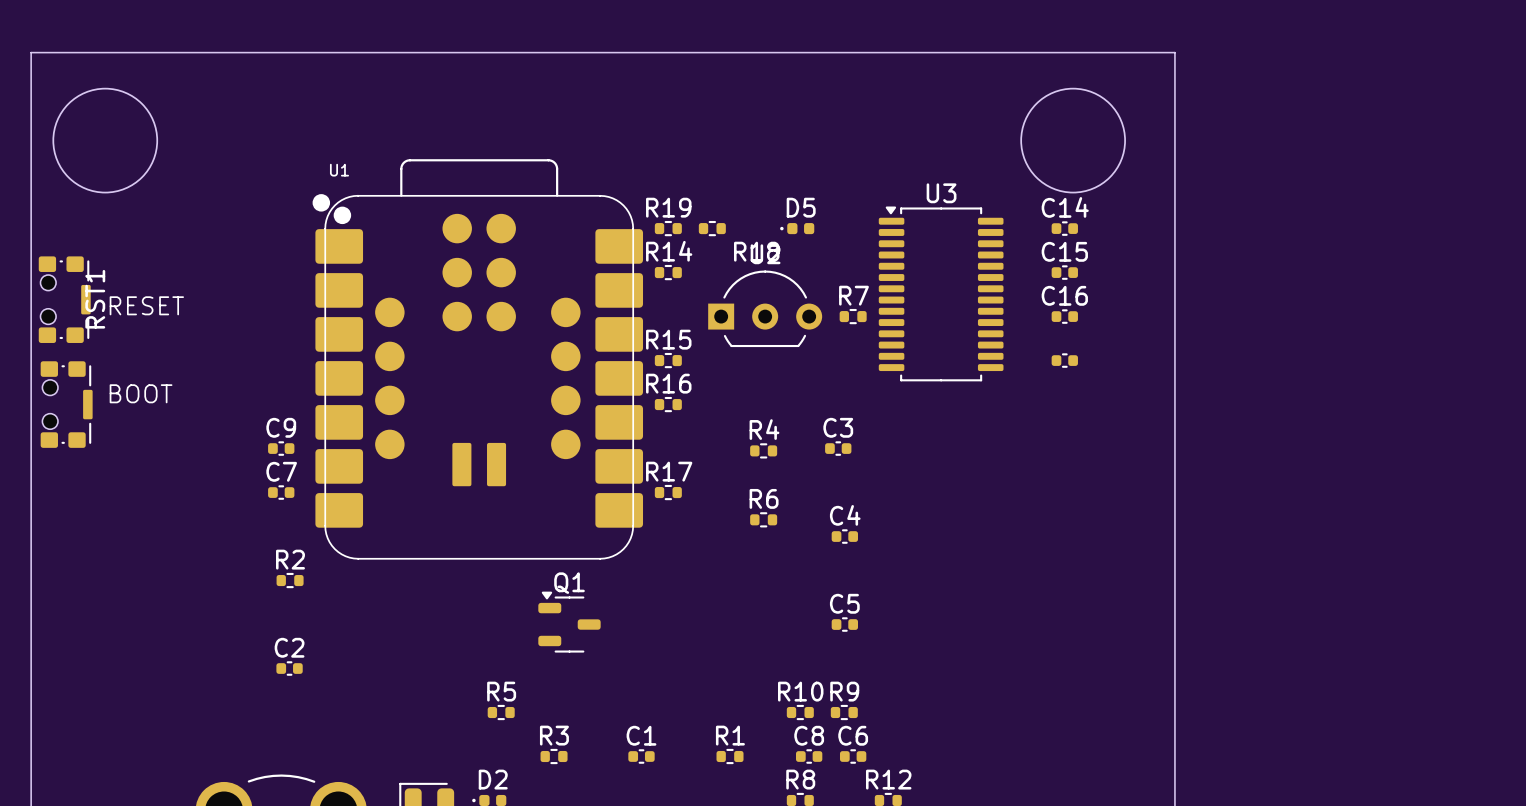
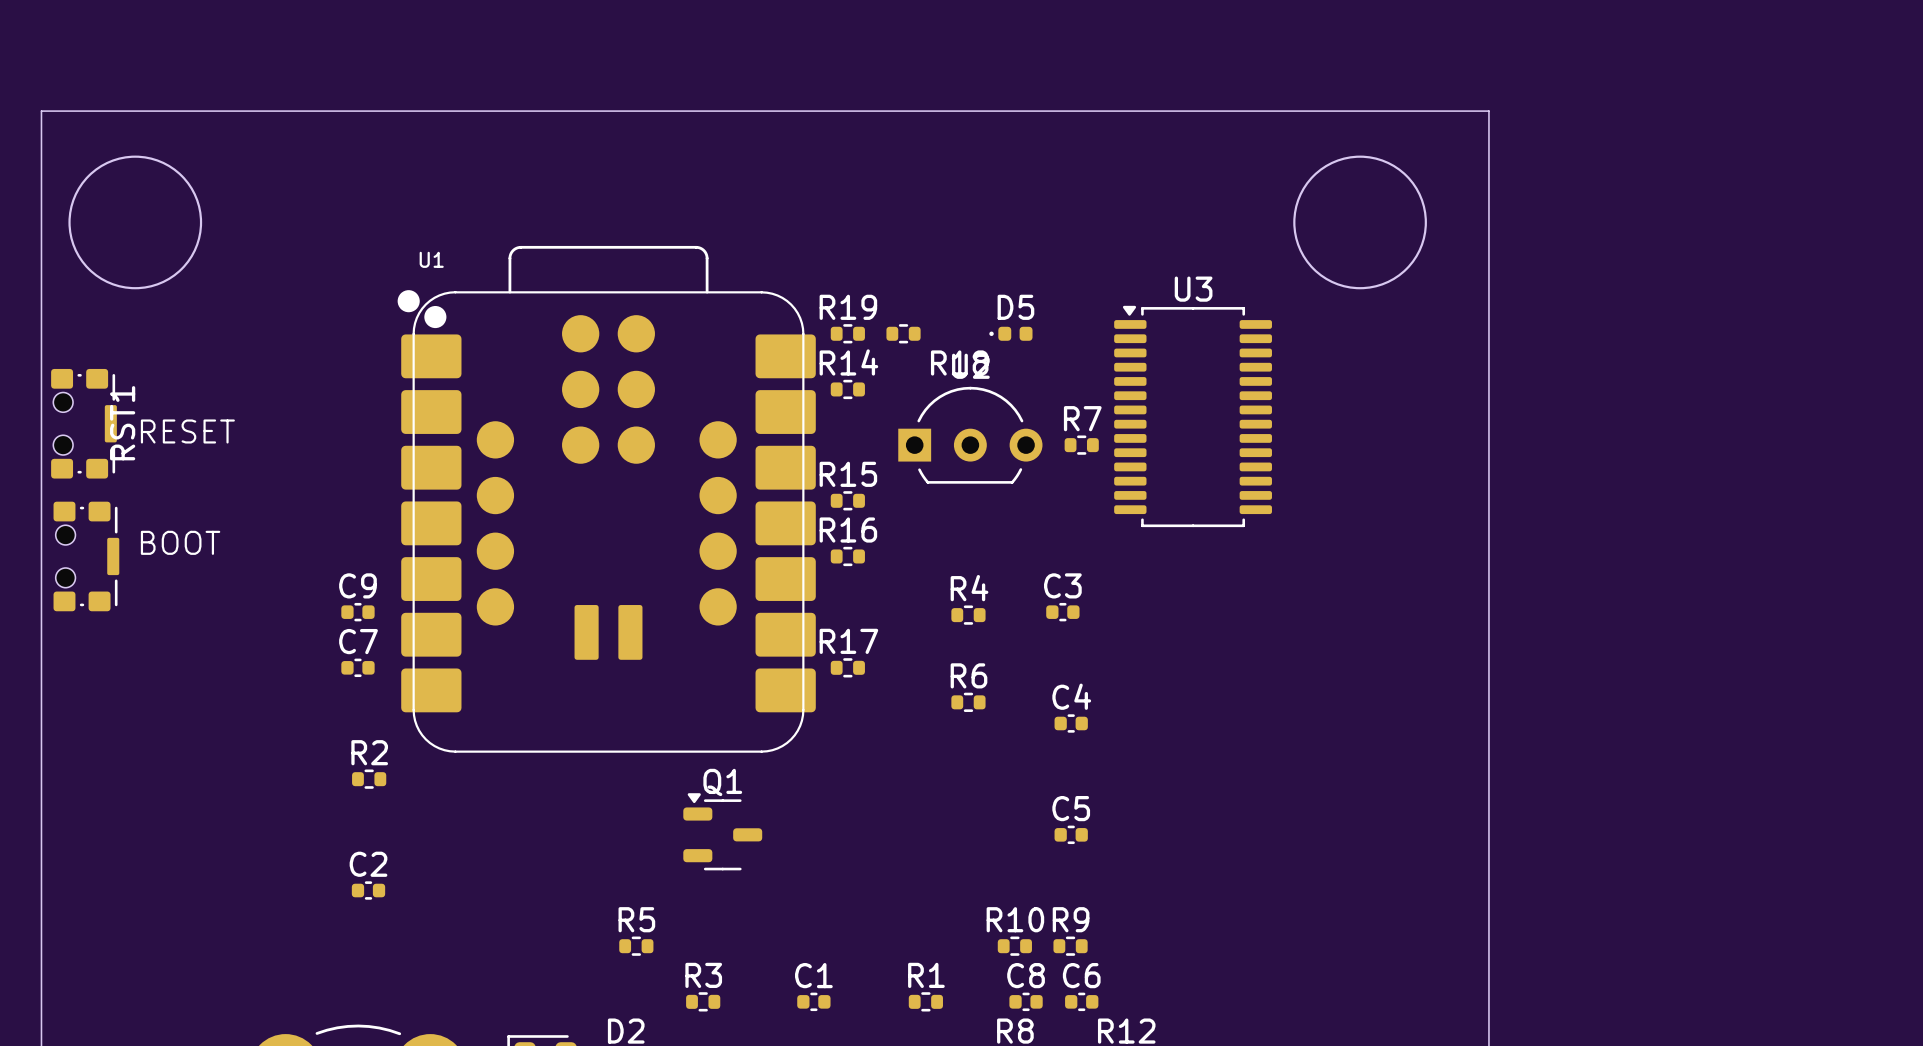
C14: (1064, 228) -> none
C15: (1064, 272) -> none
C16: (1064, 316) -> none
part: (1064, 360) -> none

